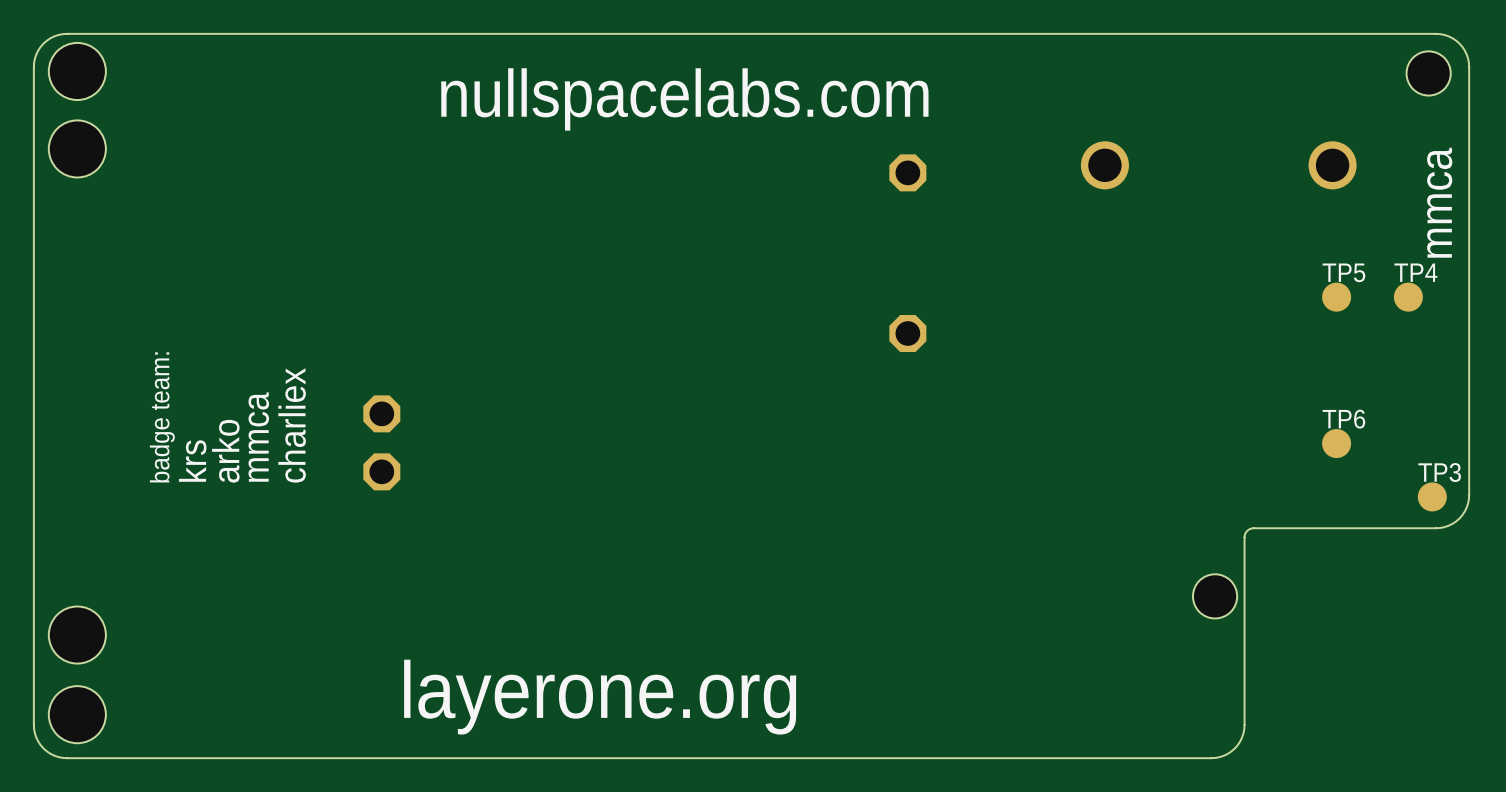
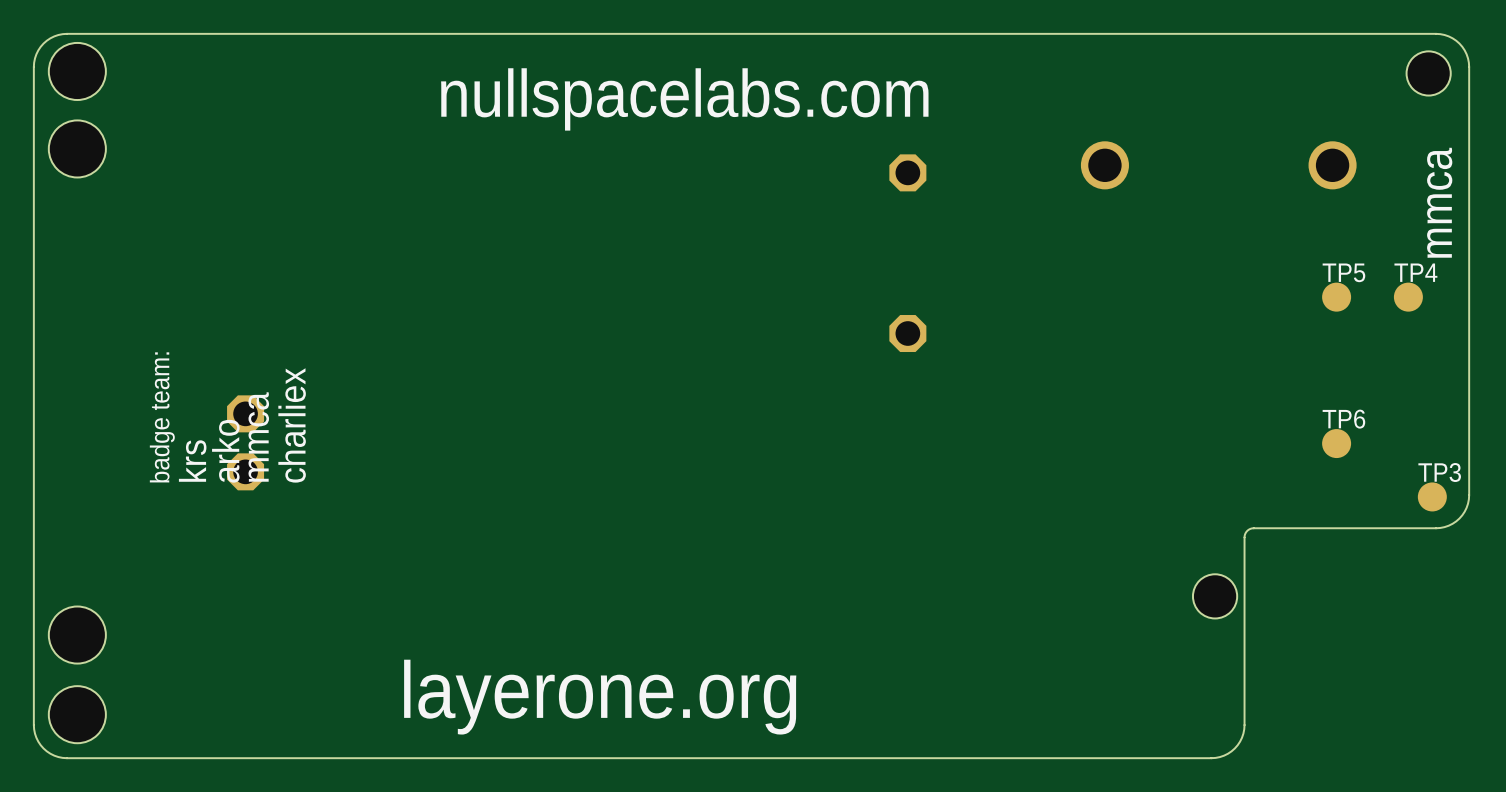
part: none -> (245, 413)
part: (381, 413) -> none
part: none -> (245, 471)
part: (381, 471) -> none

